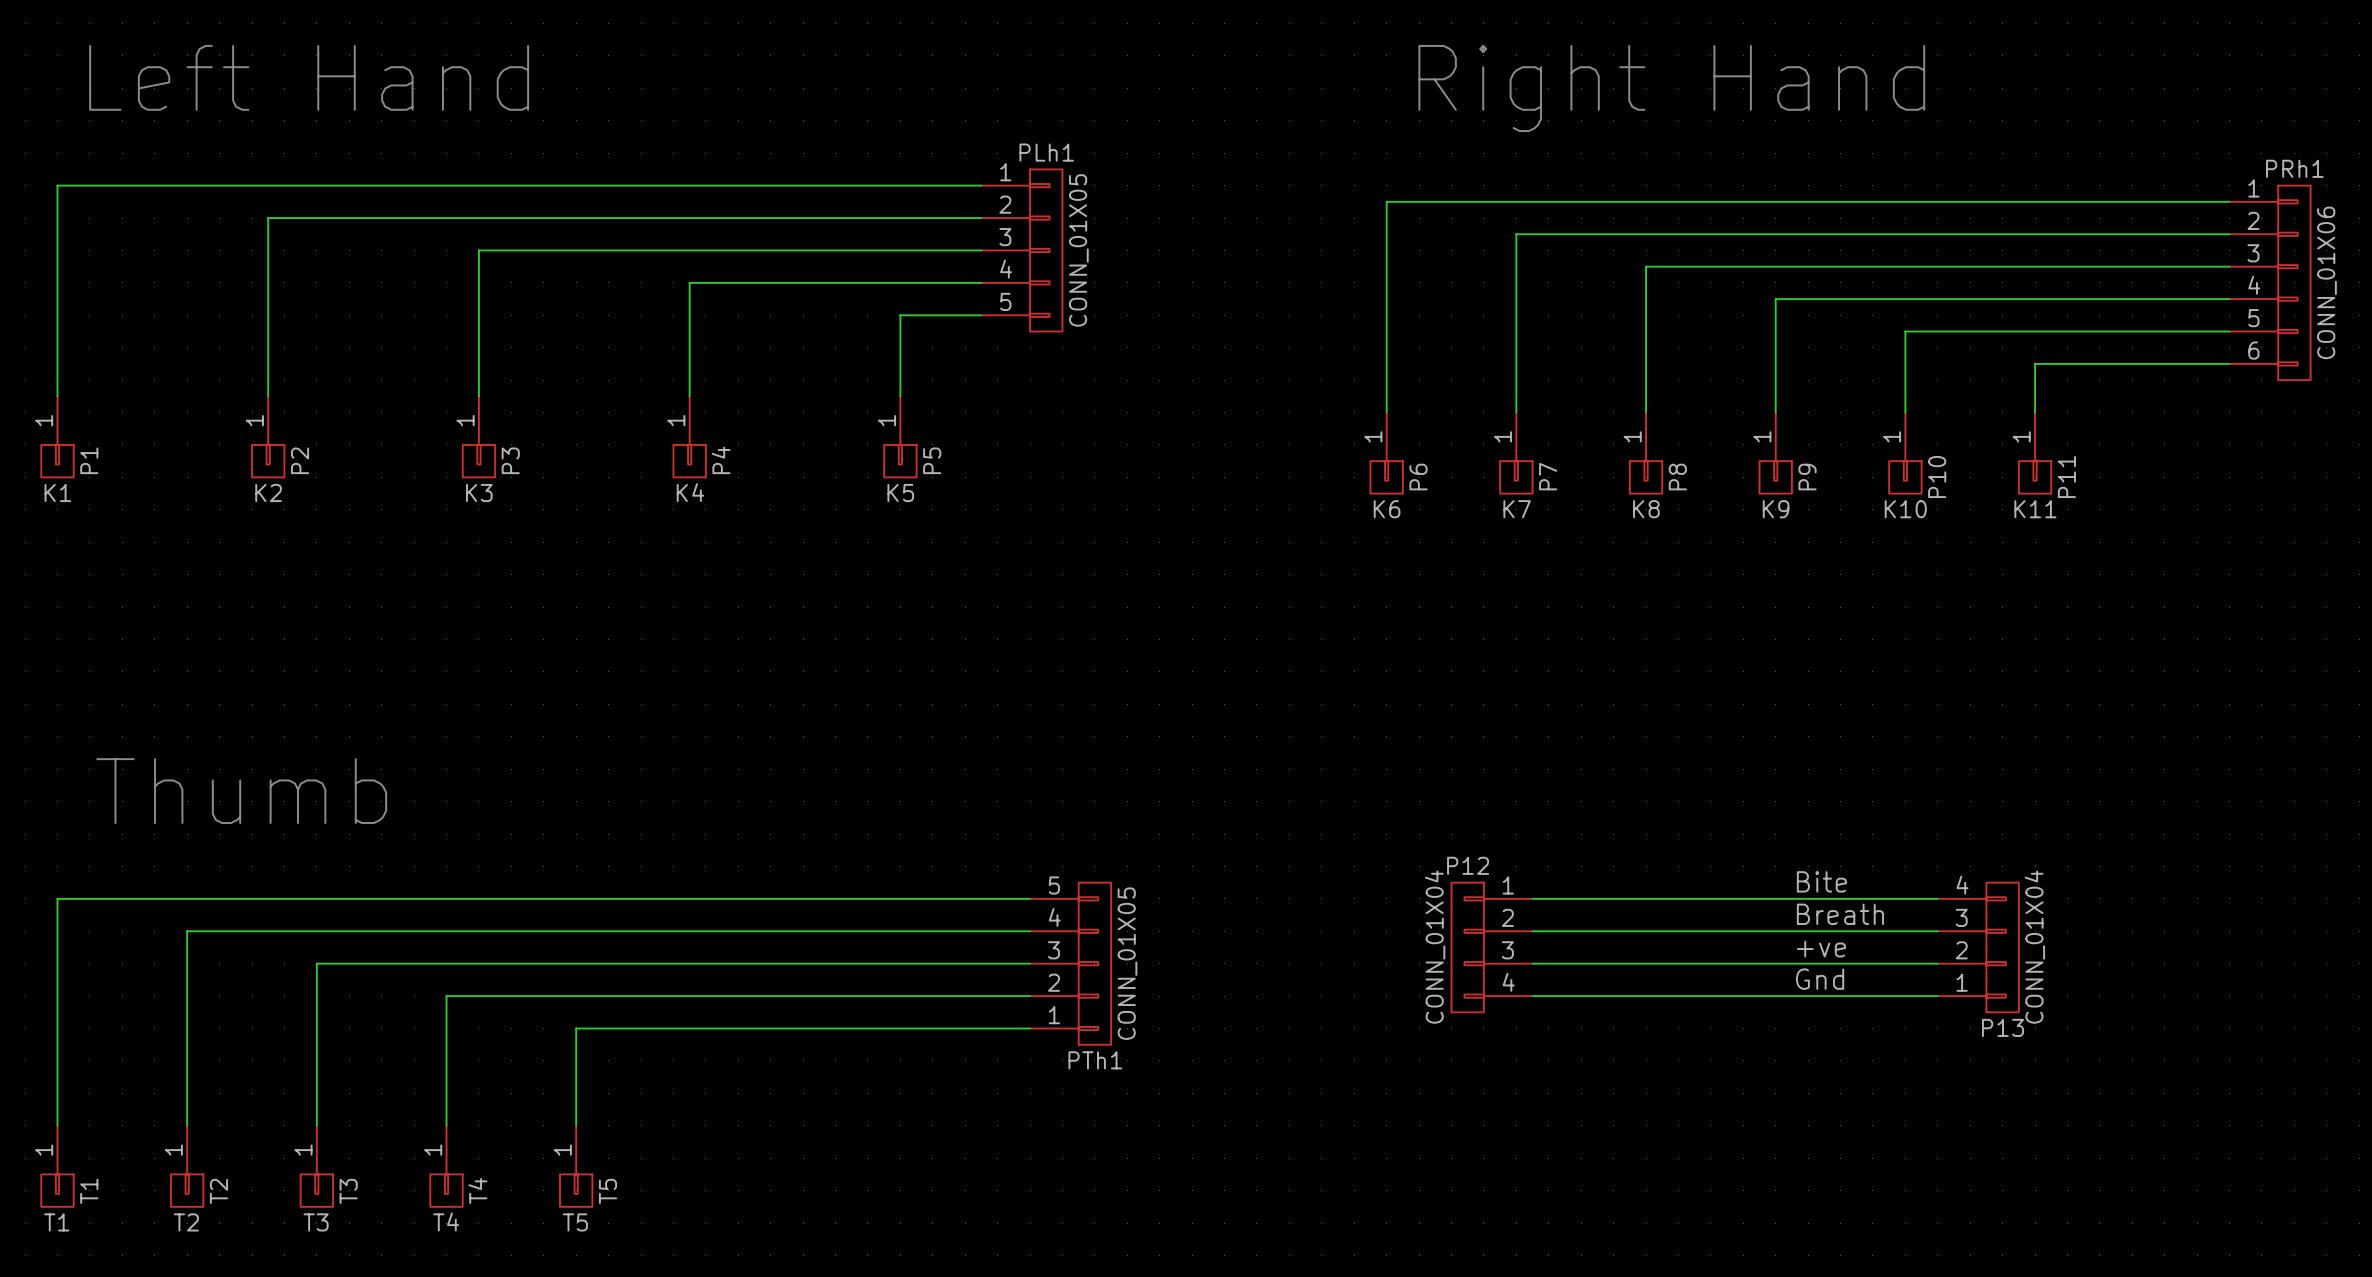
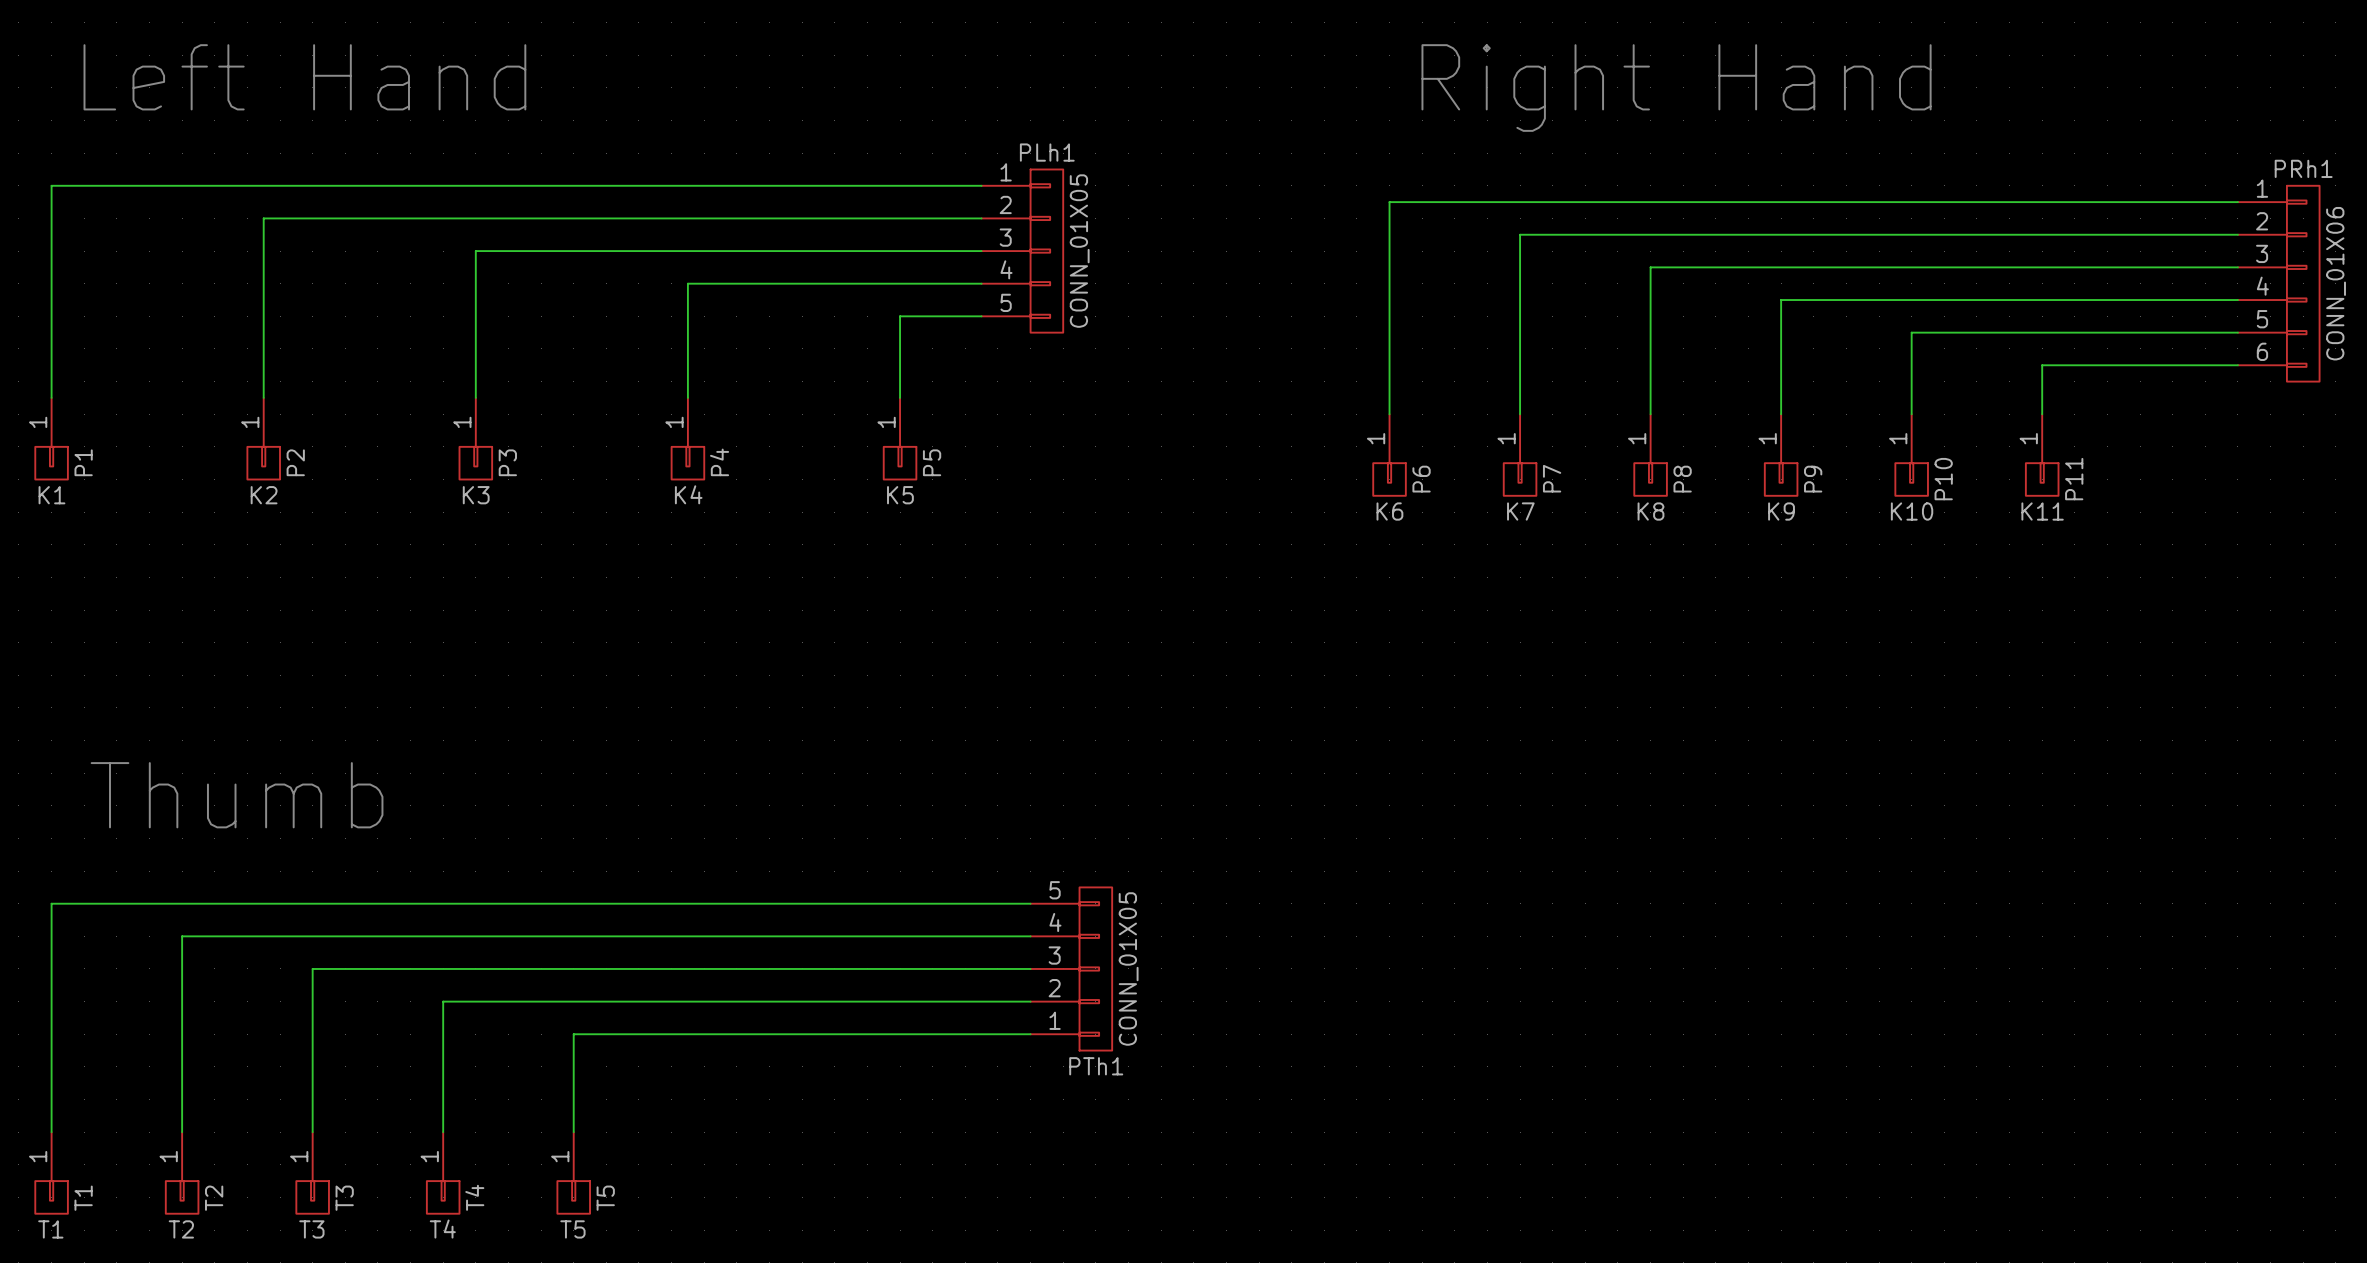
label: Bite (1821, 881) -> none
wire: (1532, 898) (1937, 898) -> none
label: Breath (1840, 914) -> none
wire: (1532, 931) (1937, 931) -> none
P12: CONN_01X04 (1492, 947) -> none
P13: CONN_01X04 (1978, 947) -> none
label: +ve (1821, 949) -> none
wire: (1532, 963) (1937, 963) -> none
label: Gnd (1820, 979) -> none
wire: (1532, 996) (1937, 996) -> none

